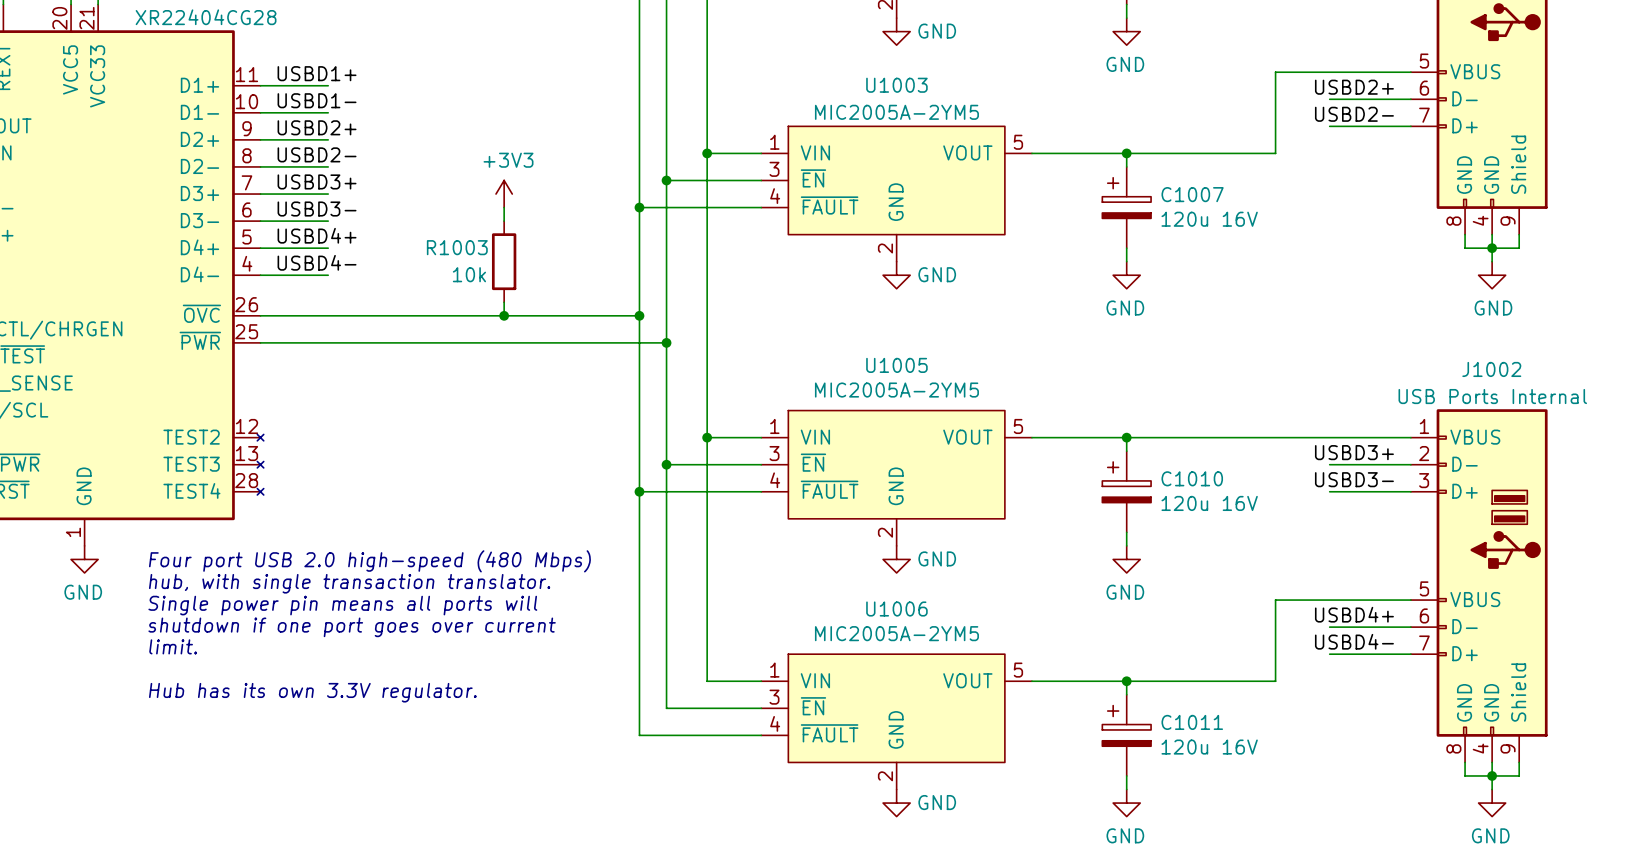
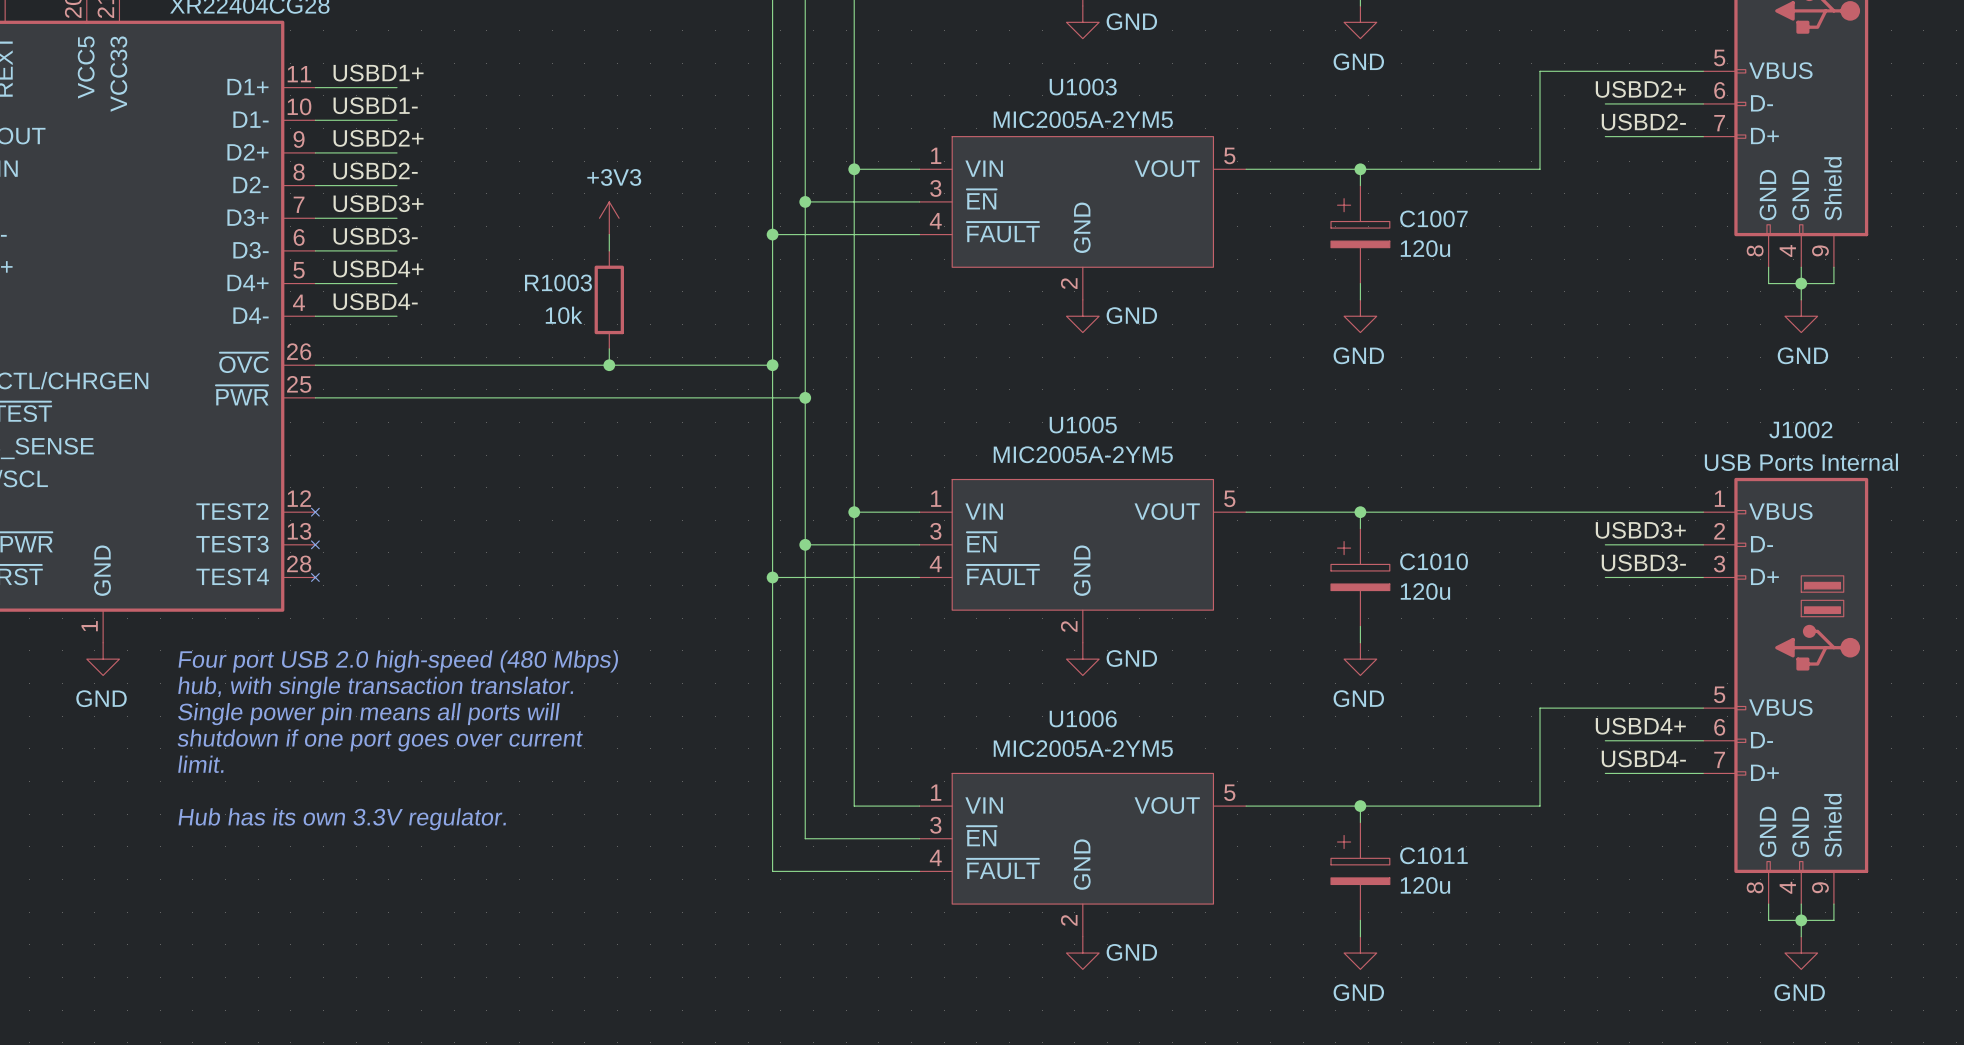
C1007 value: 120u 16V (1209, 219) -> 120u (1425, 248)
C1010 value: 120u 16V (1209, 503) -> 120u (1425, 591)
C1011 value: 120u 16V (1209, 747) -> 120u (1425, 885)

